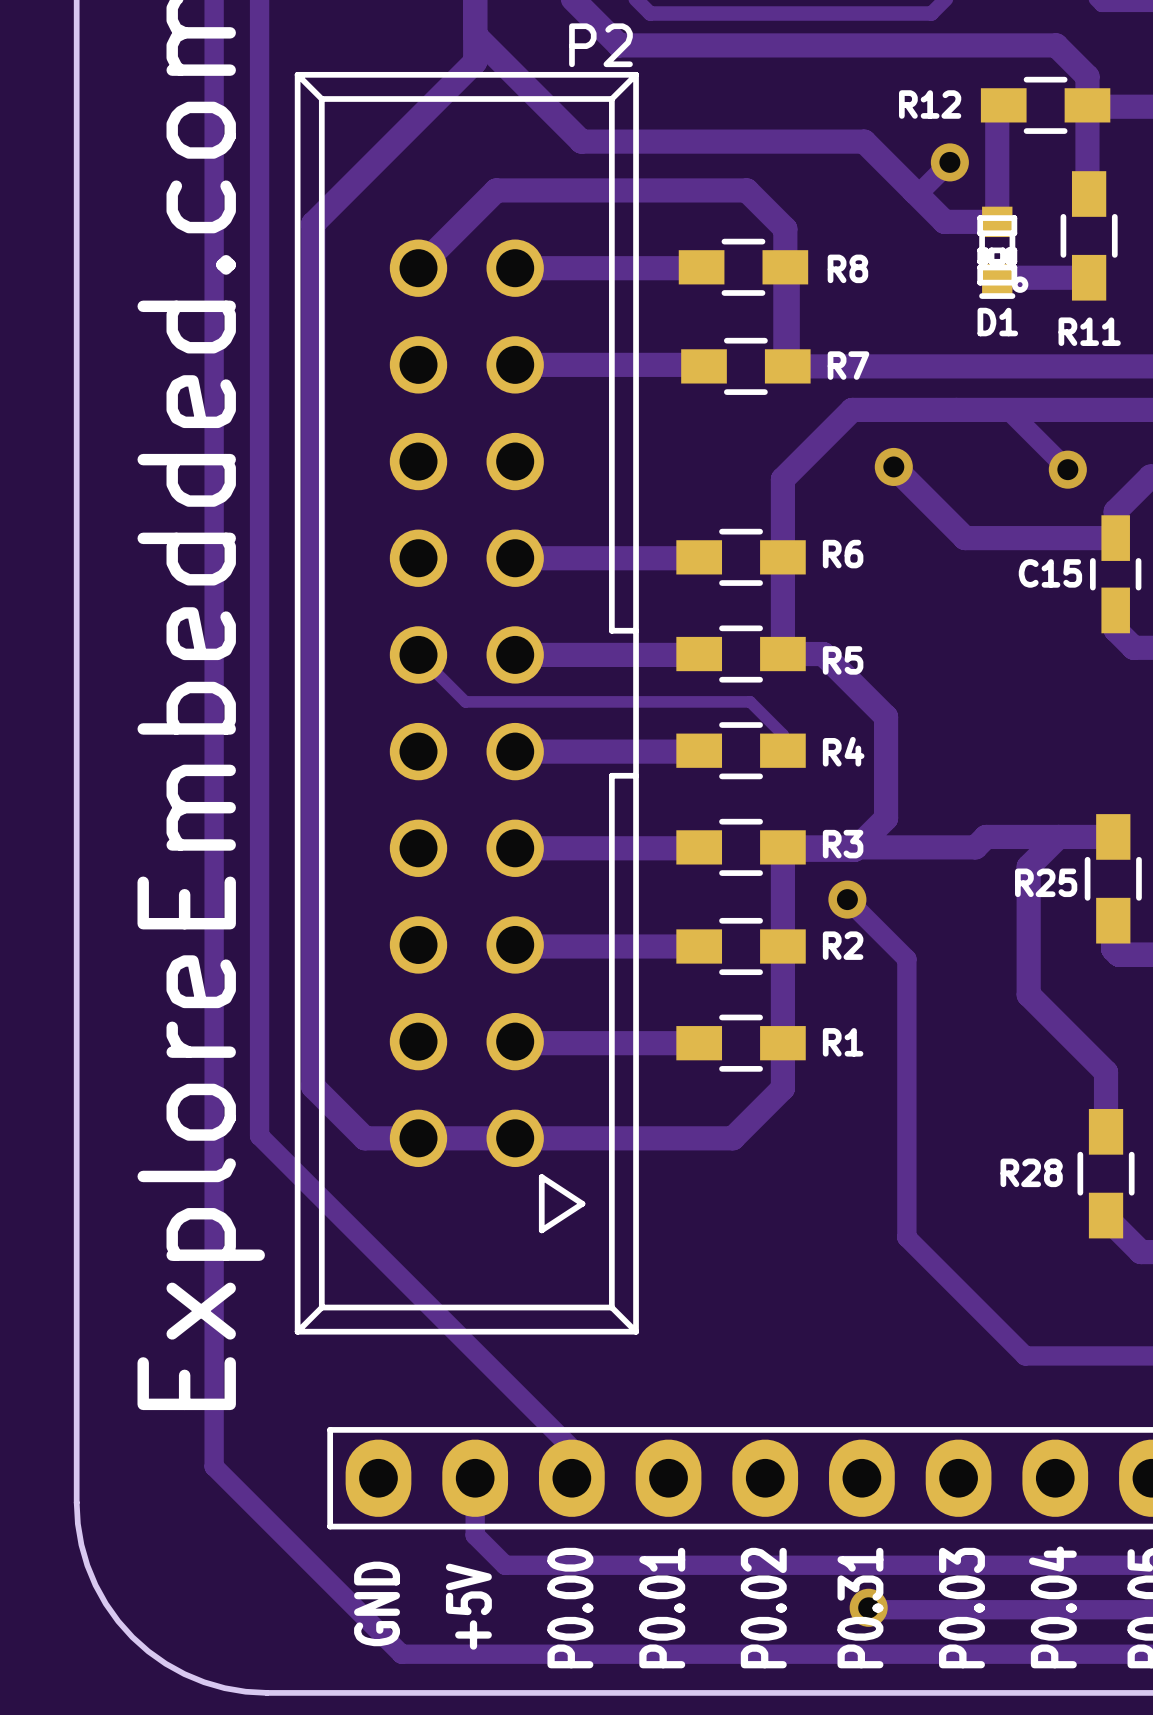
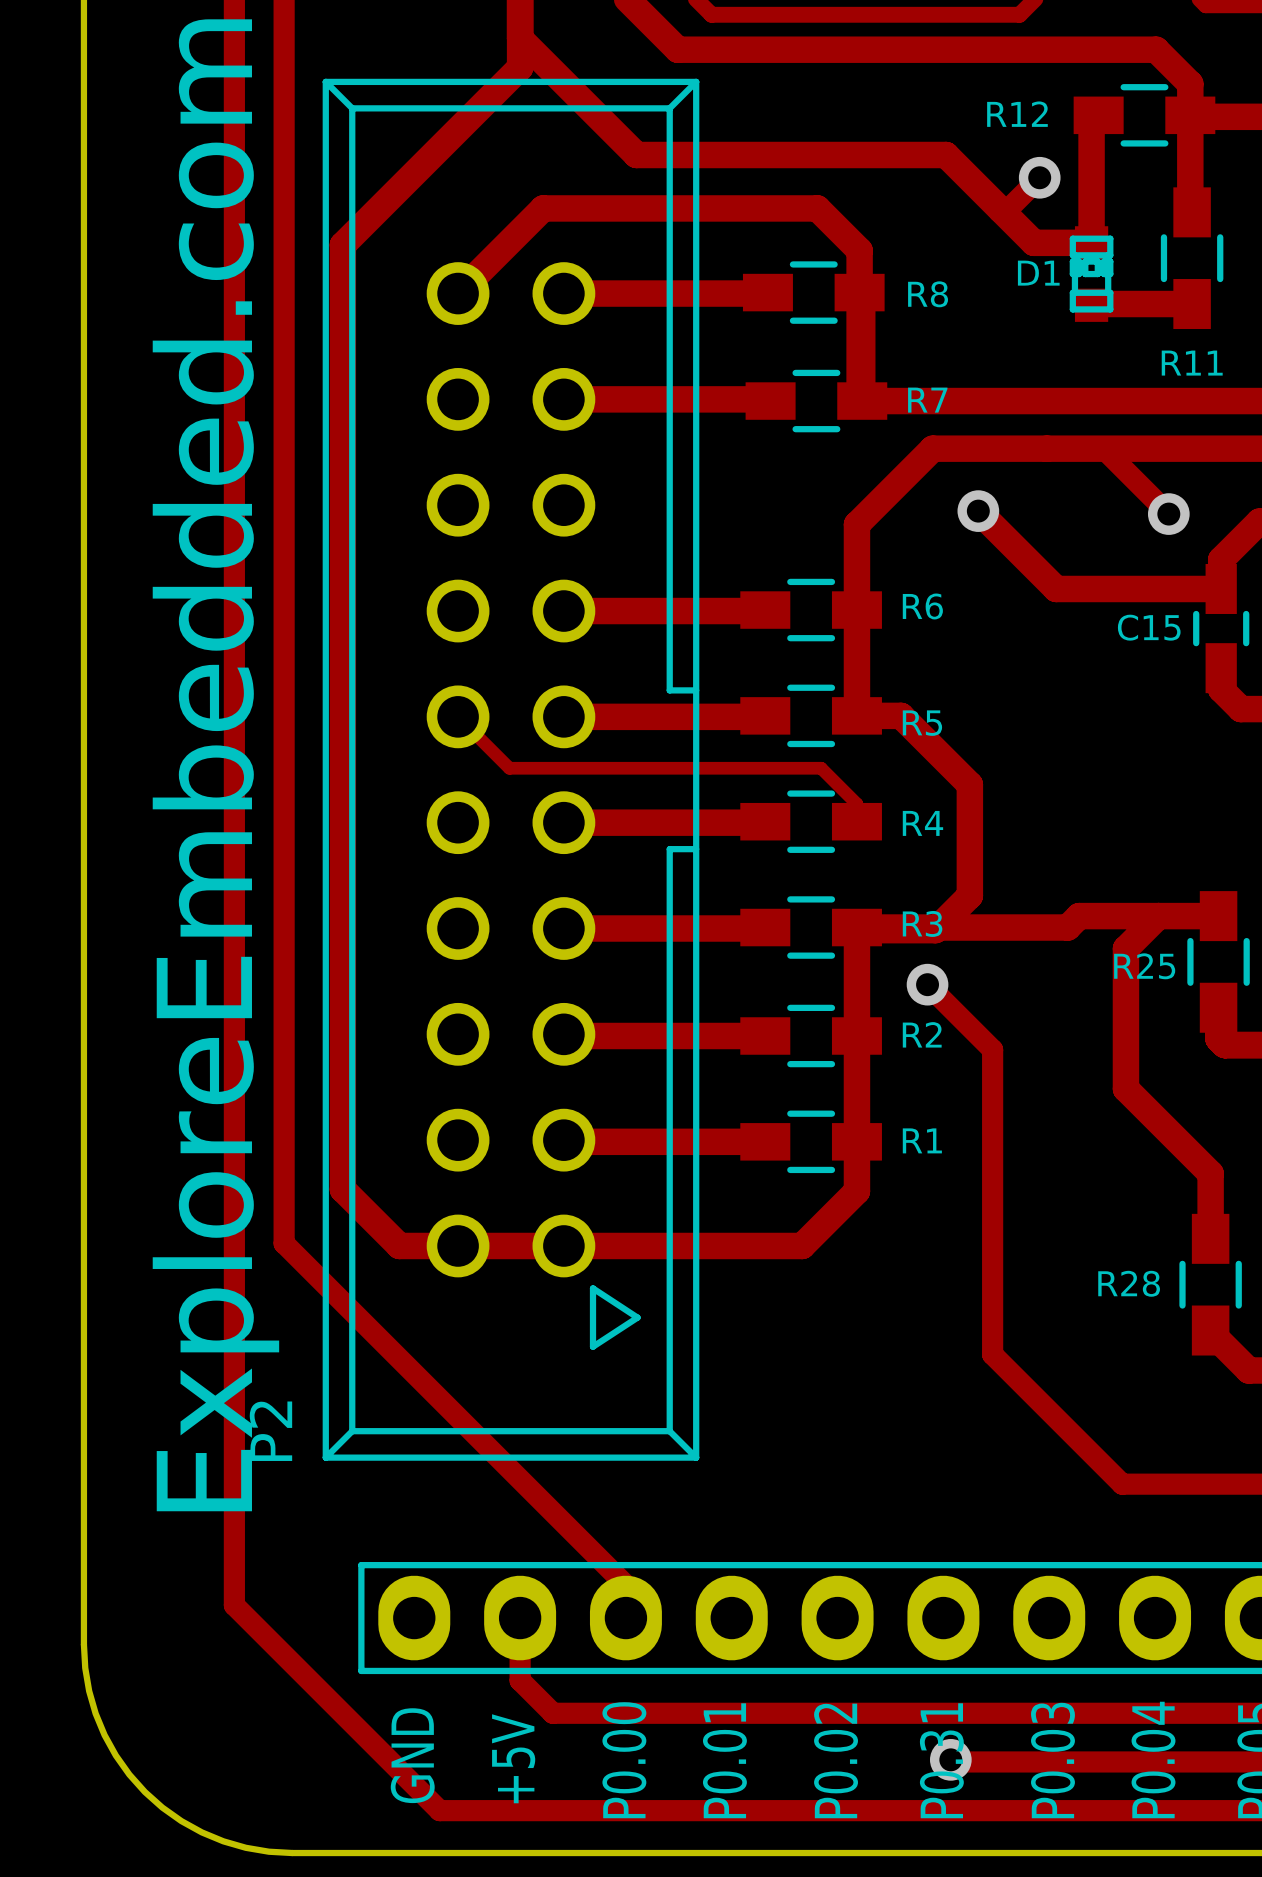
P2 name rotation: 0° (600, 45) -> 90° counterclockwise (270, 1431)
P2 name position: P2 (600, 45) -> P2 (270, 1431)
D1 footprint: [977, 206, 1029, 299] -> [1069, 226, 1114, 322]
D1 name position: D1 (997, 322) -> D1 (1038, 273)

